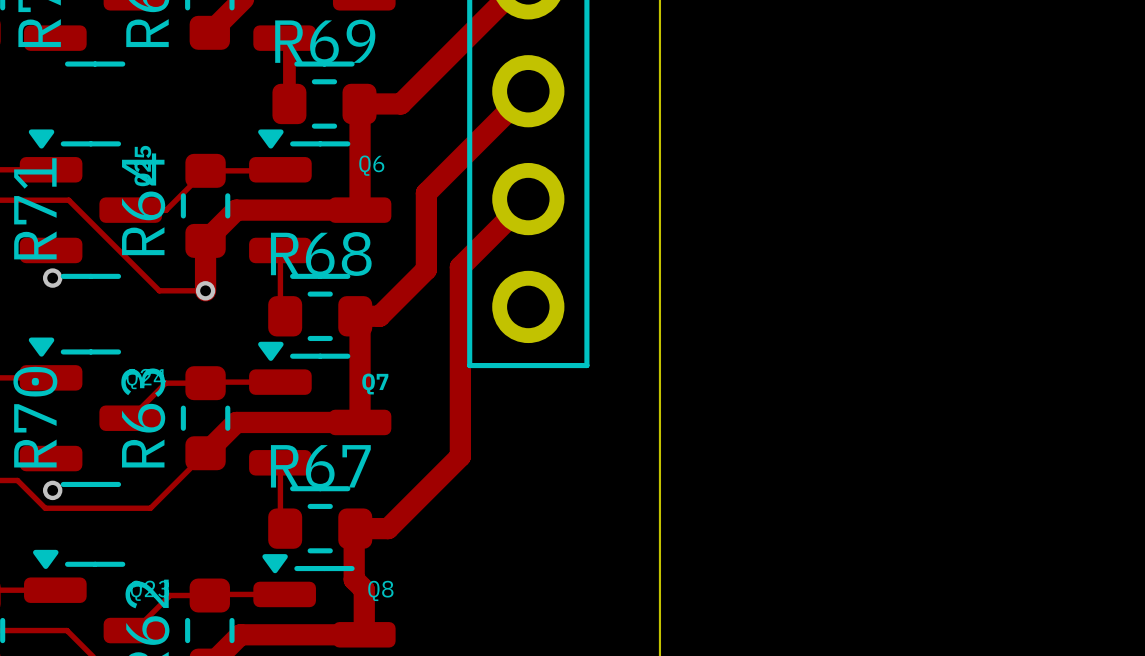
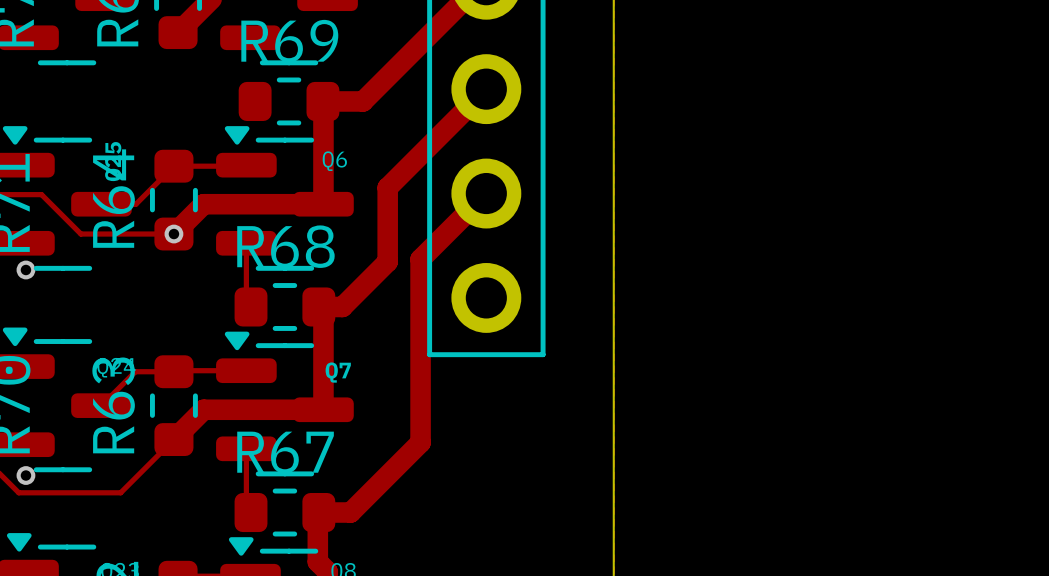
track: (284, 38) (289, 42) (289, 103) -> none
track: (109, 240) (159, 290) (205, 290) (205, 240) -> (80, 234) (173, 234)
via position: (205, 290) -> (173, 234)

